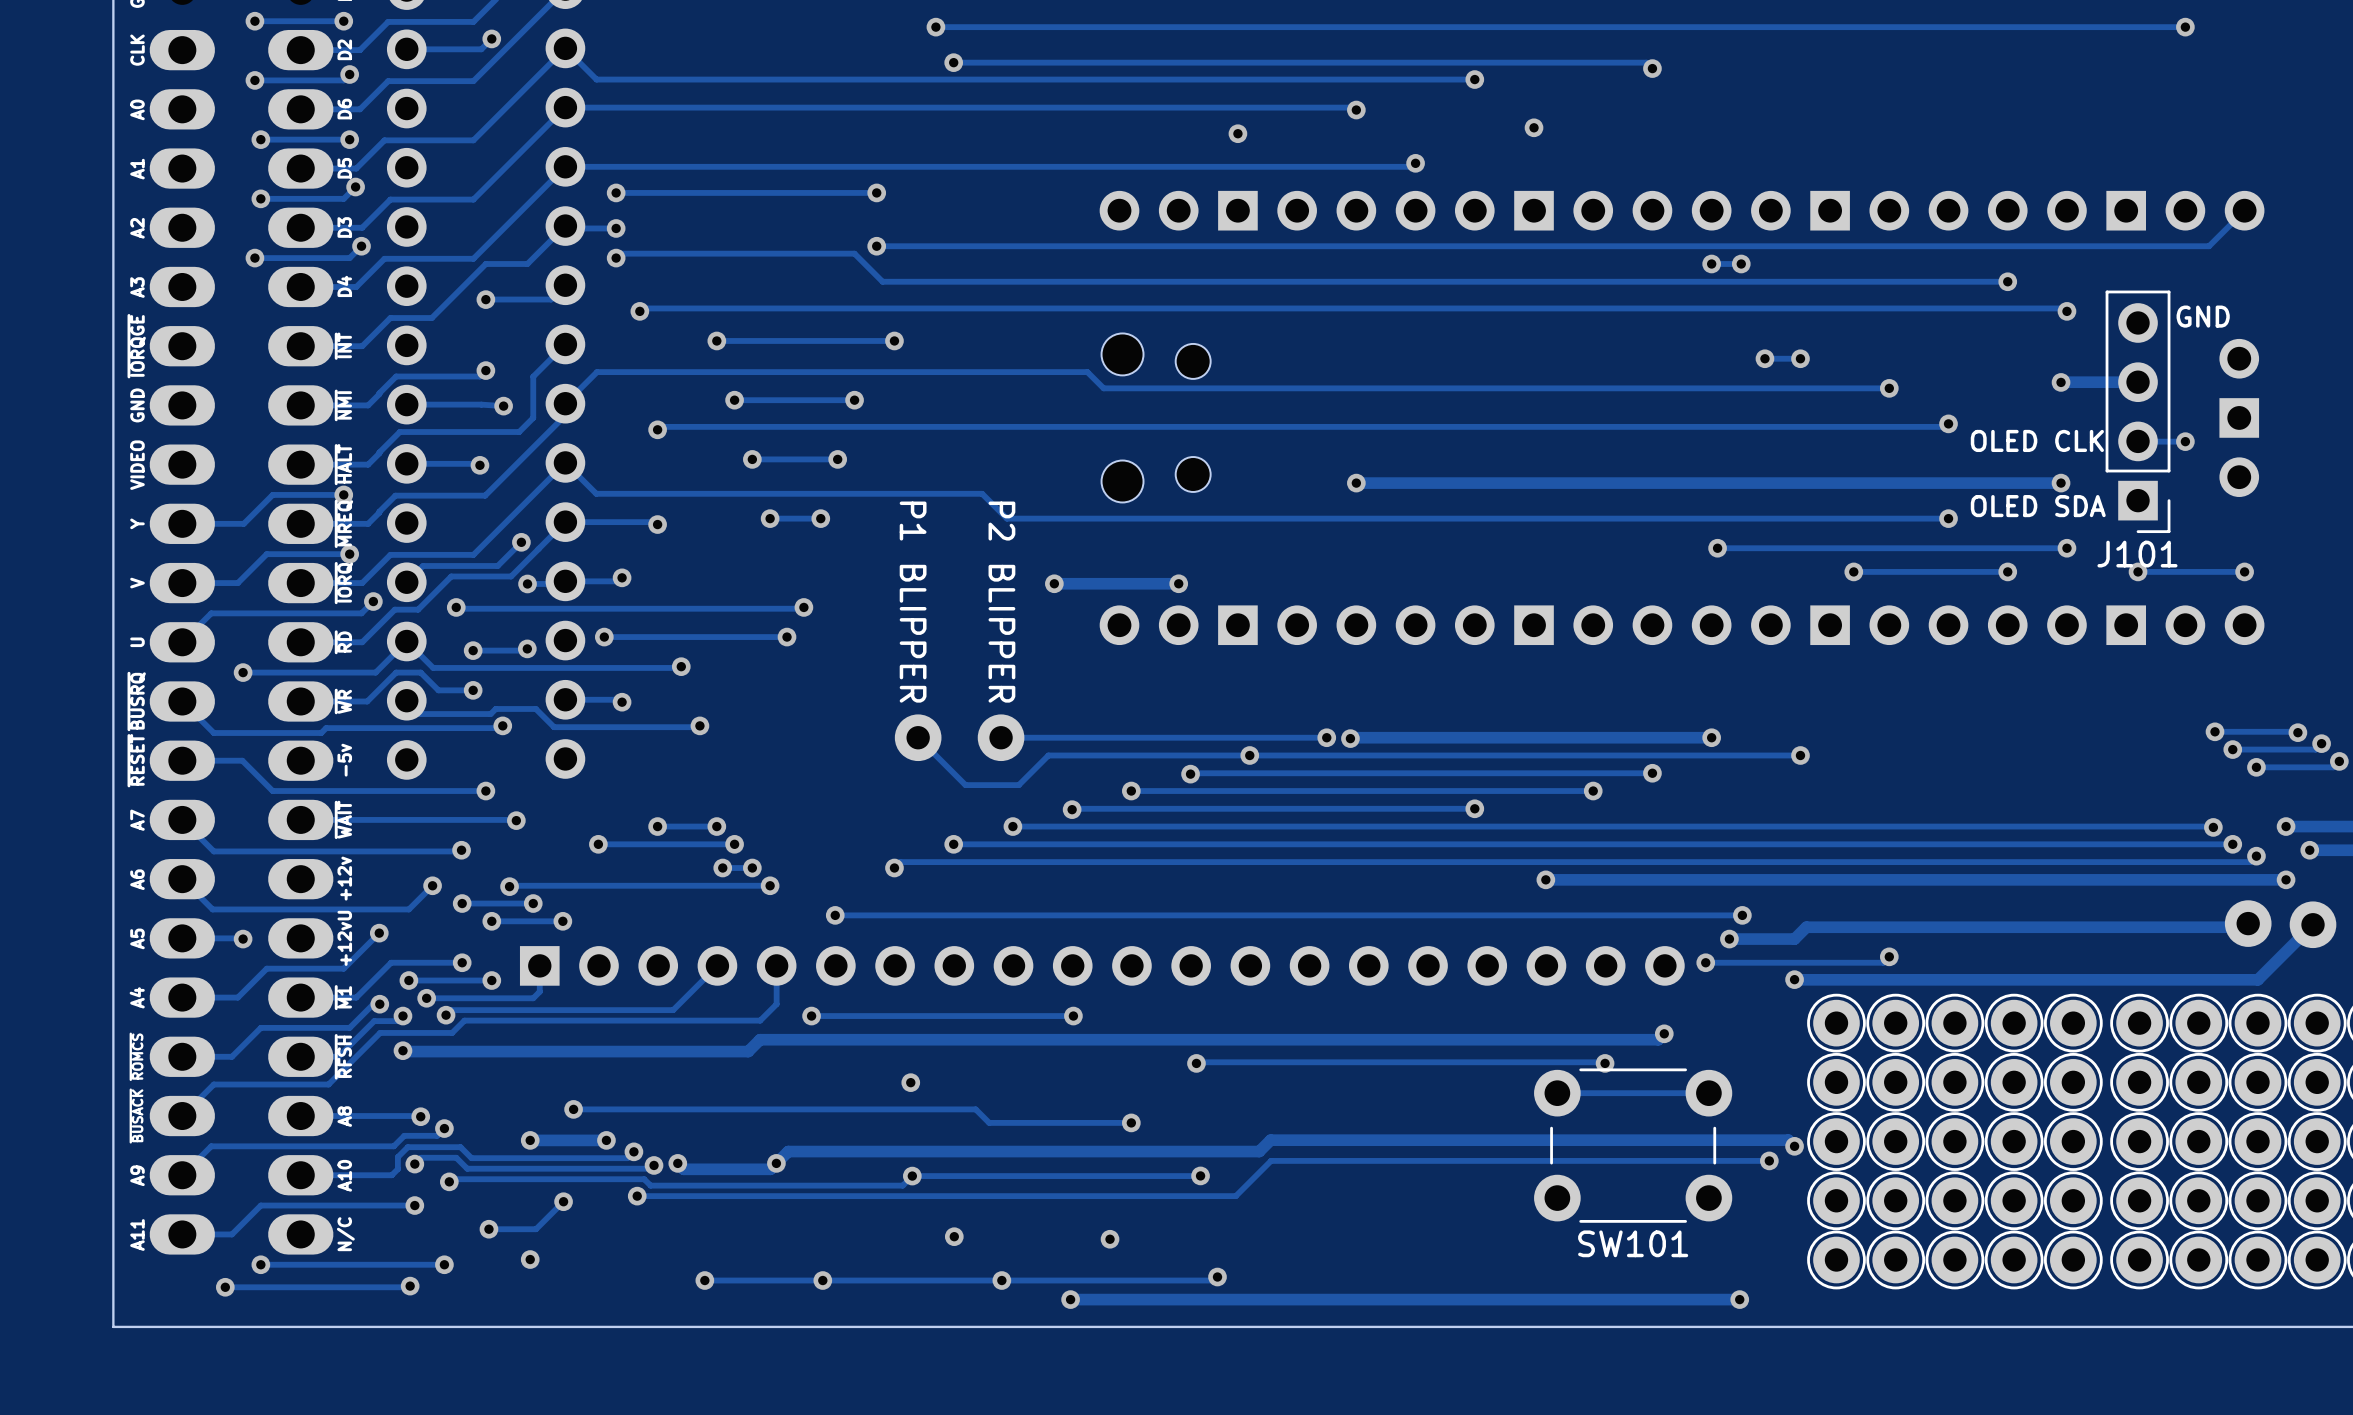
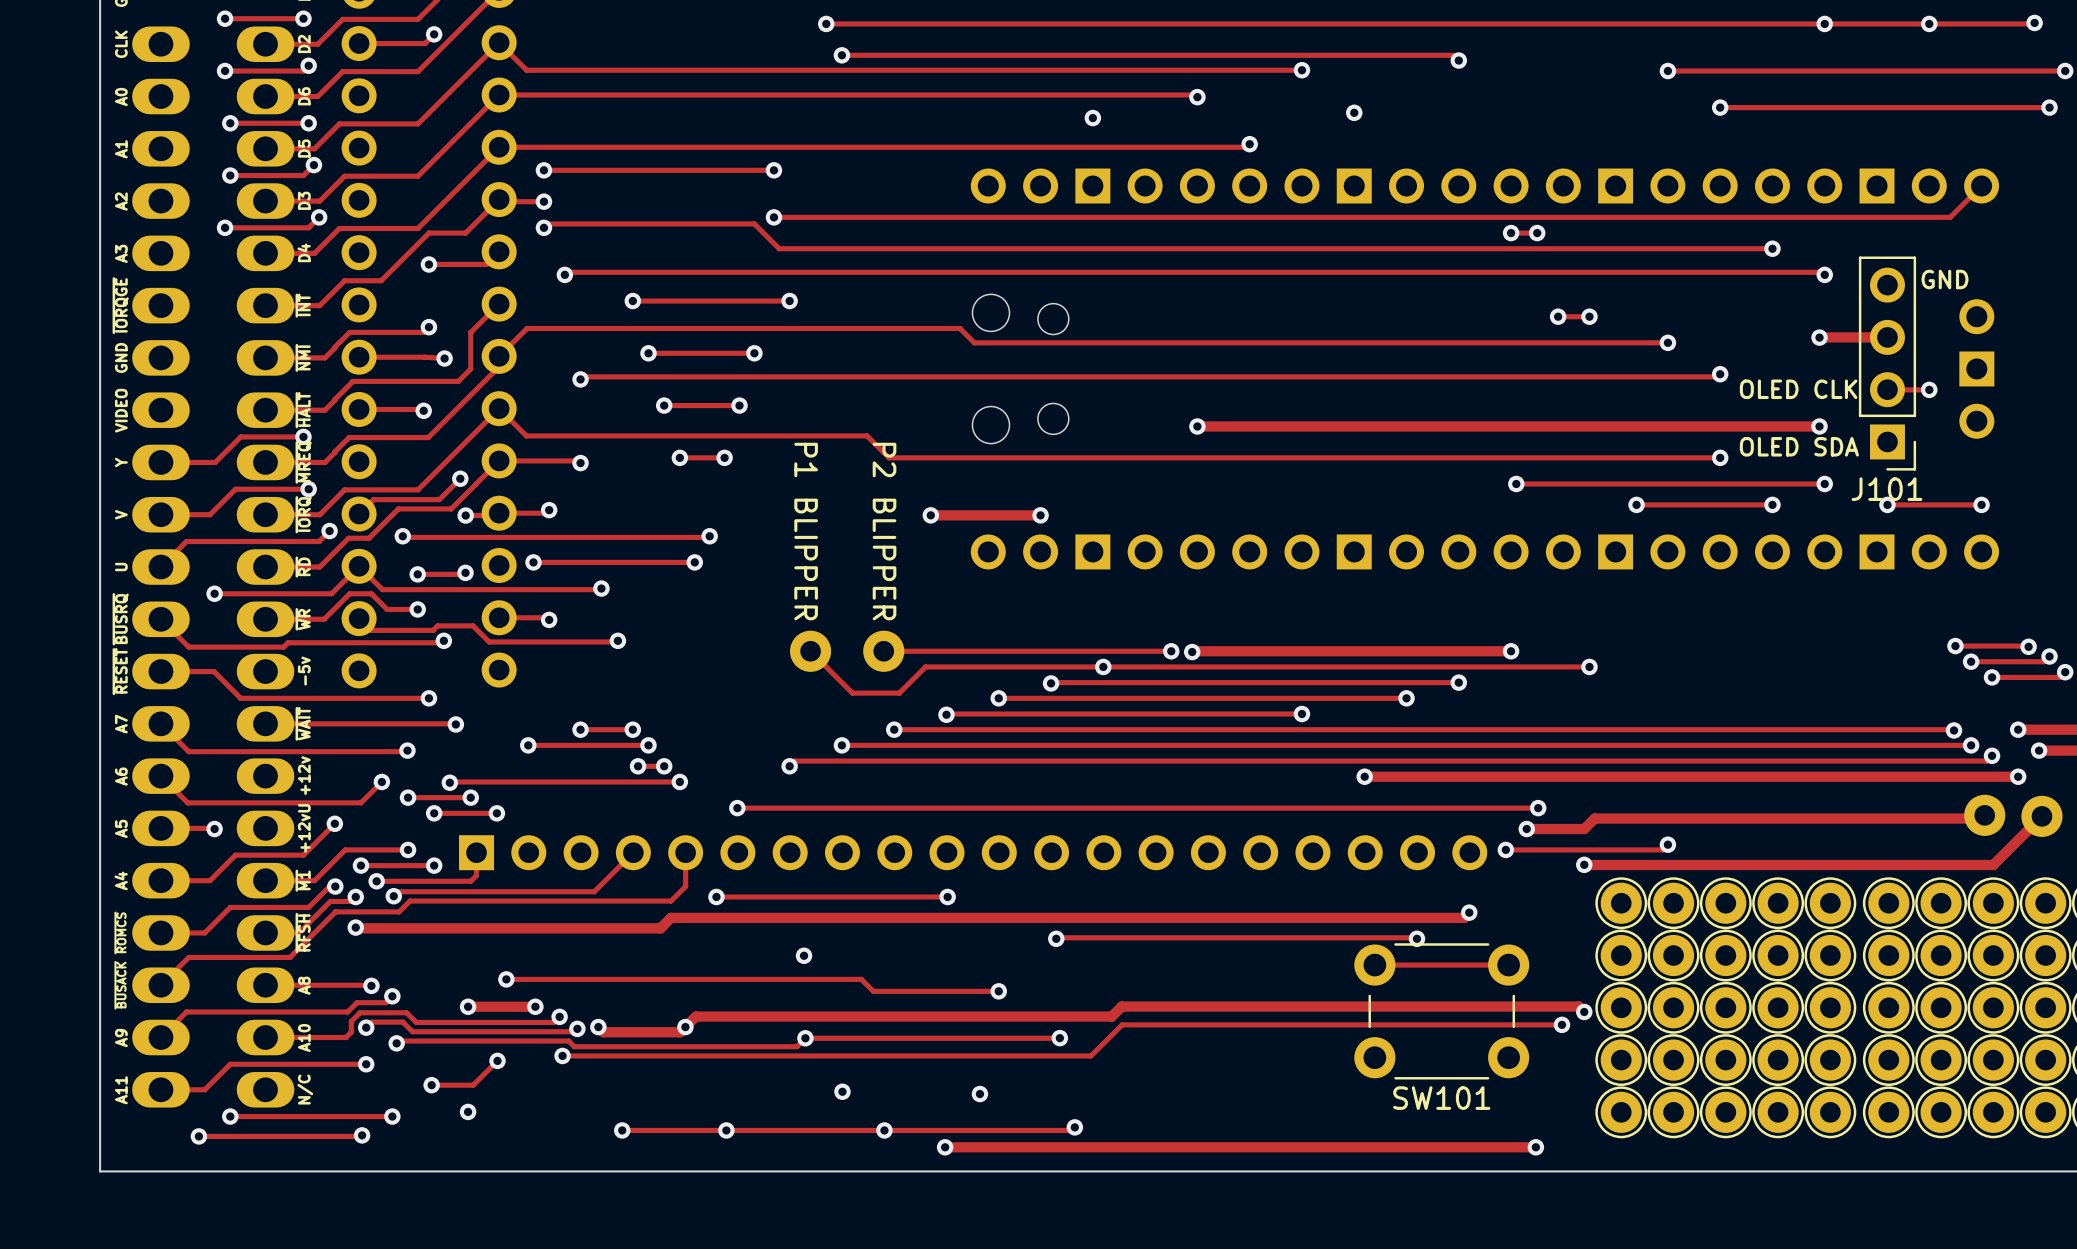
track: none -> (2034, 22) (1929, 23)
via: none -> (2034, 22)
via: none -> (1824, 23)
track: none -> (1667, 71) (2065, 71)
via: none -> (1667, 71)
via: none -> (2065, 71)
track: none -> (1720, 107) (2049, 107)
via: none -> (1720, 107)
via: none -> (2049, 107)

